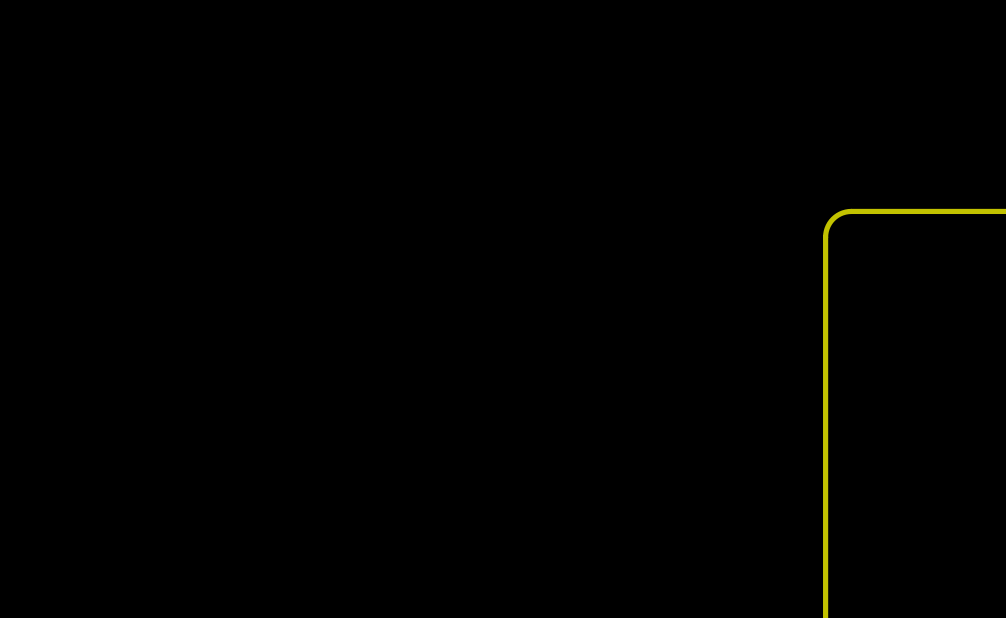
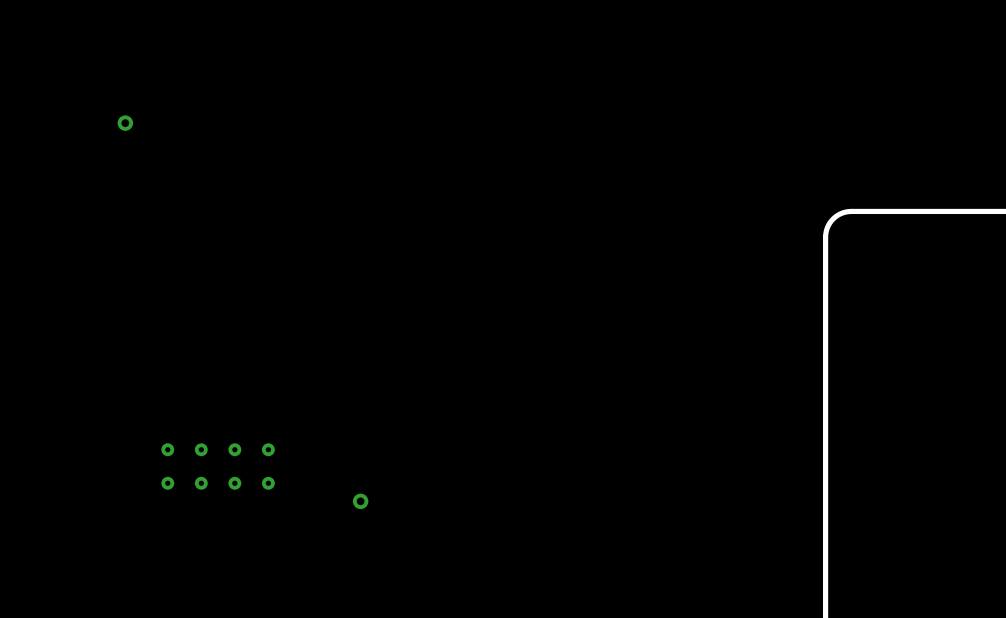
via: none -> (125, 123)
part: none -> (218, 466)
via: none -> (360, 501)

